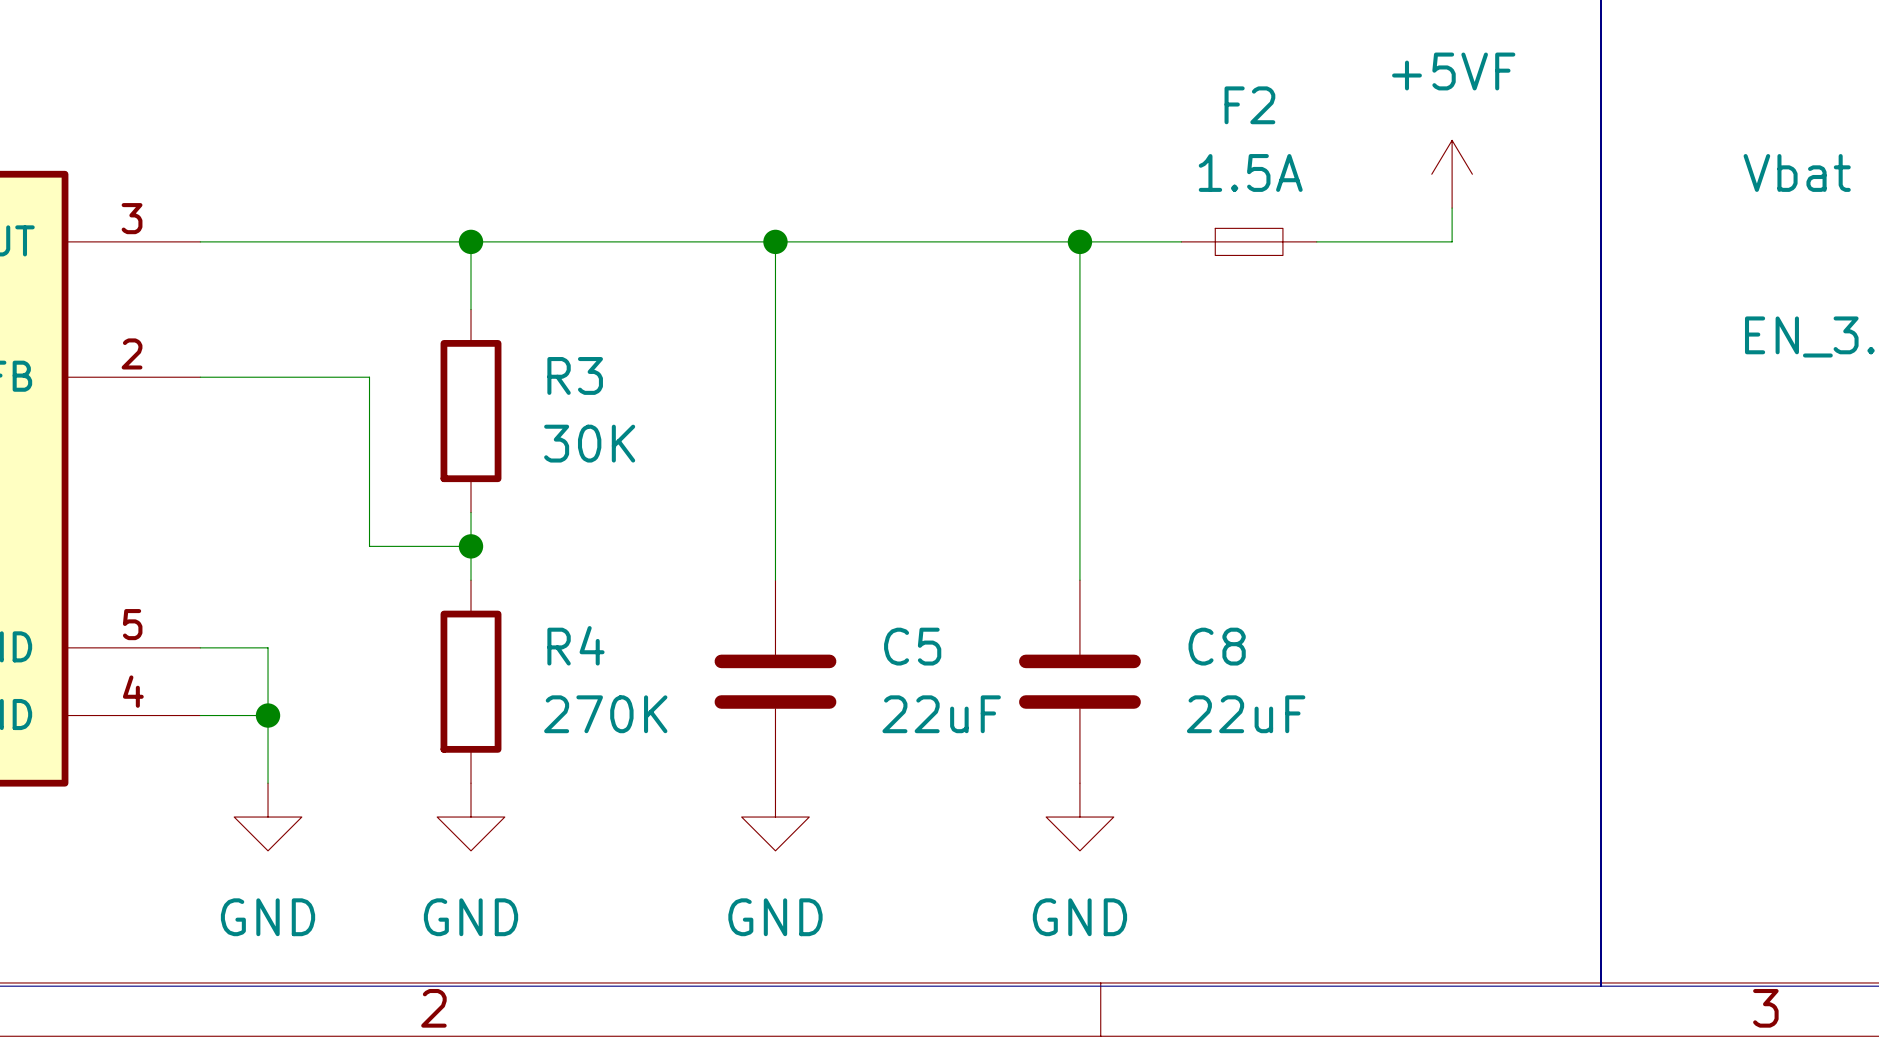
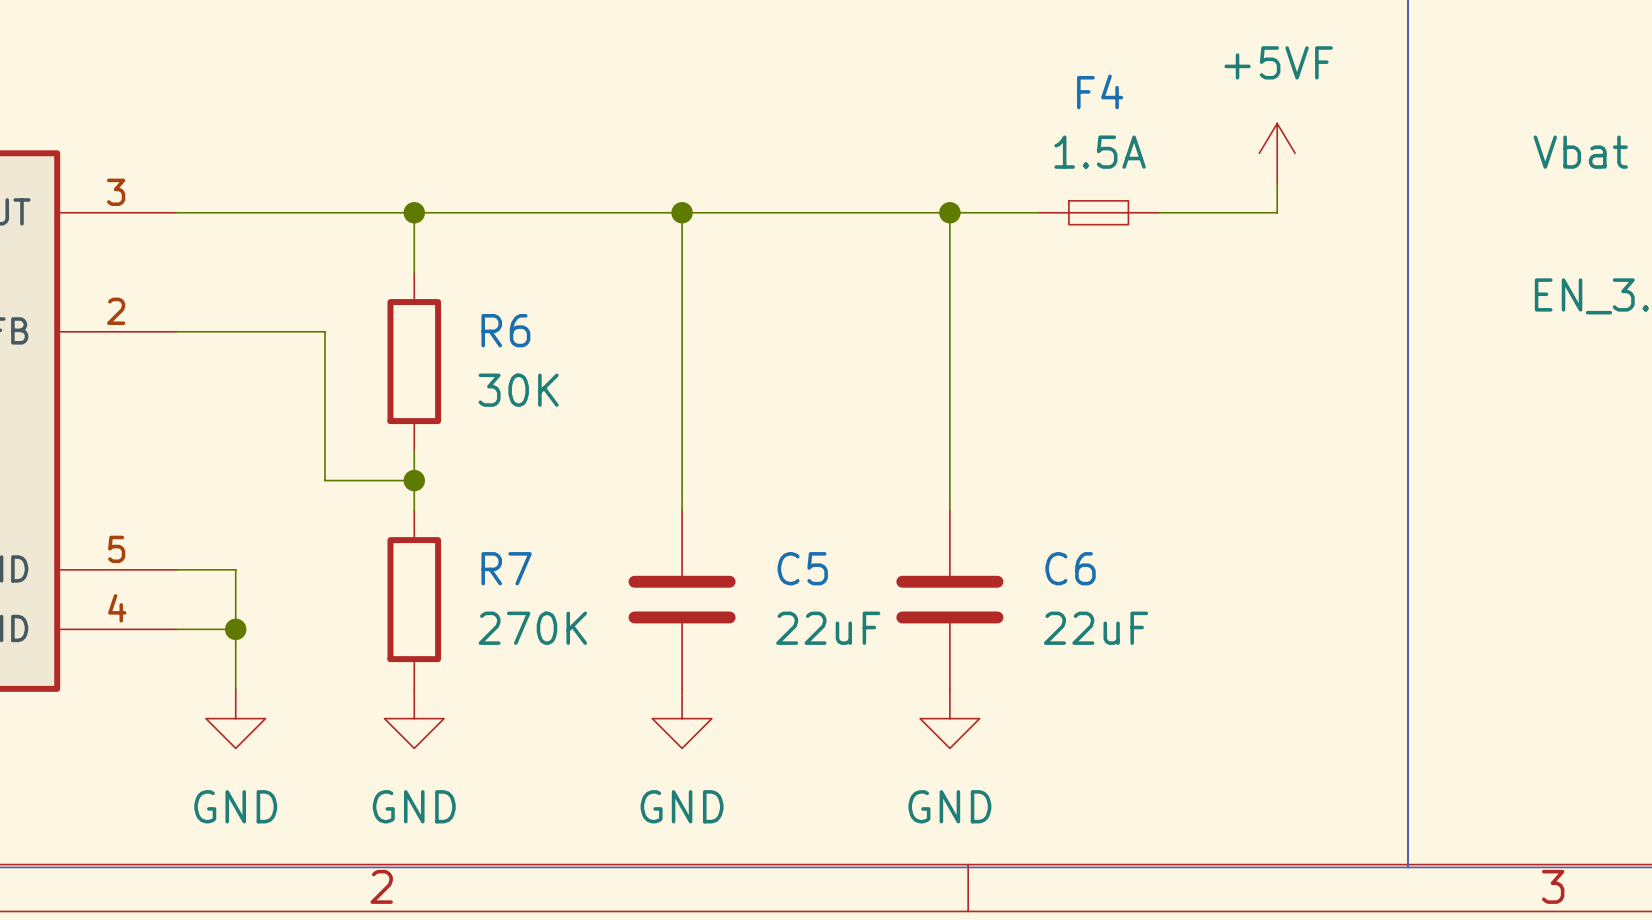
F2 name: F2 (1249, 105) -> F4 (1100, 91)
R3 name: R3 (575, 375) -> R6 (505, 330)
R4 name: R4 (575, 645) -> R7 (506, 568)
C8 name: C8 (1217, 646) -> C6 (1070, 568)

